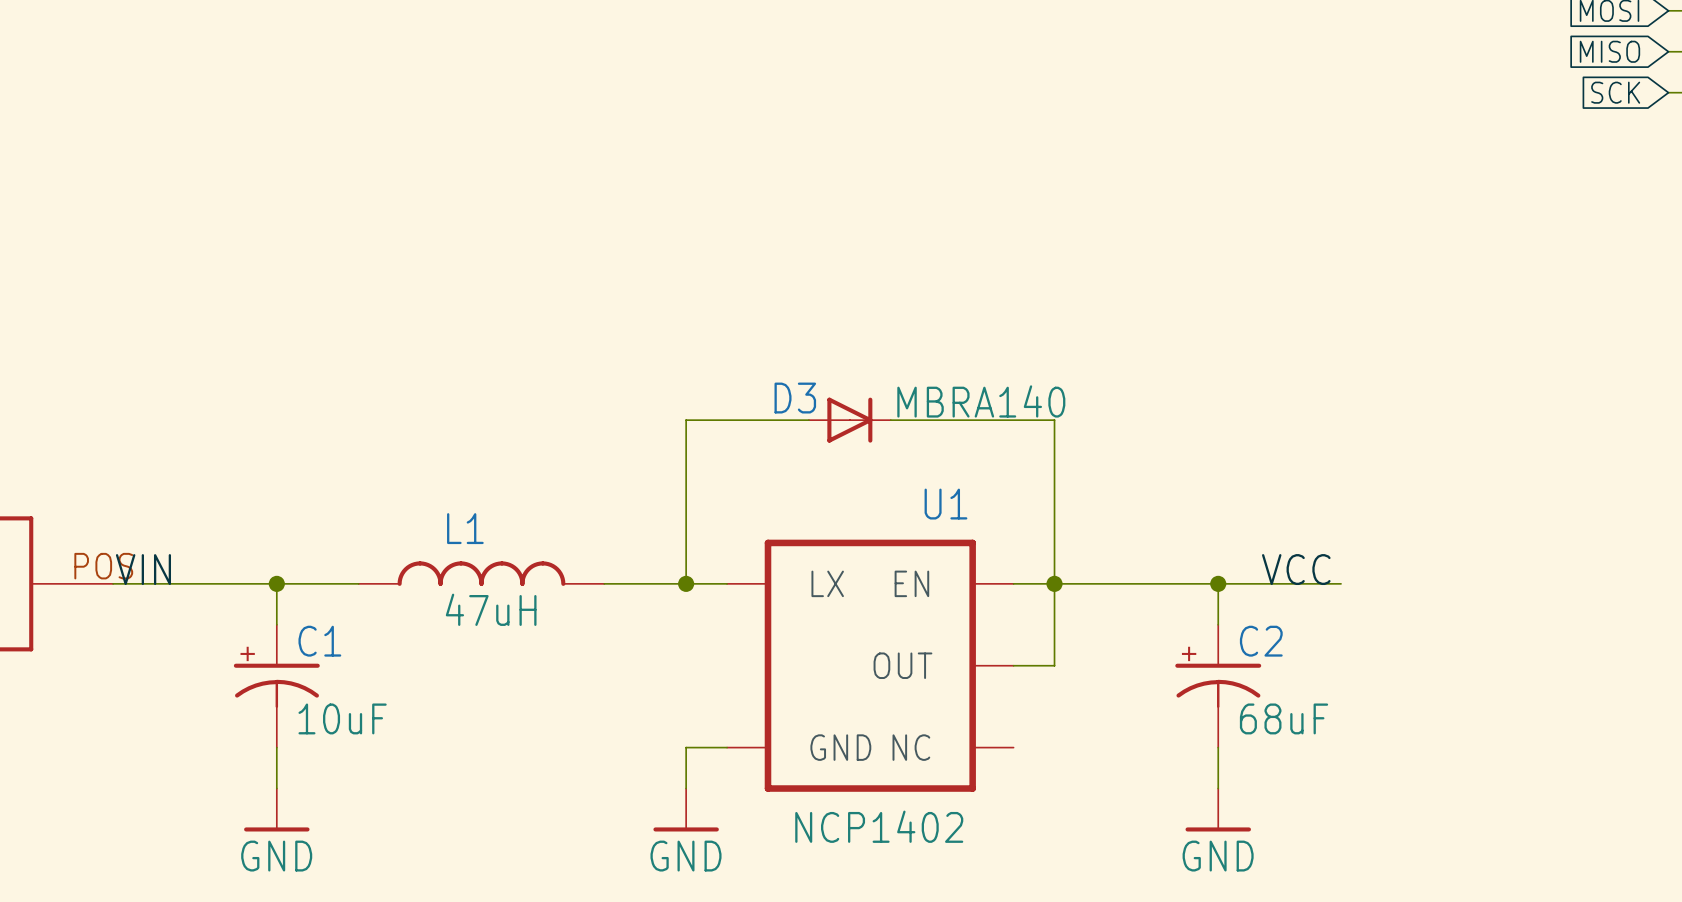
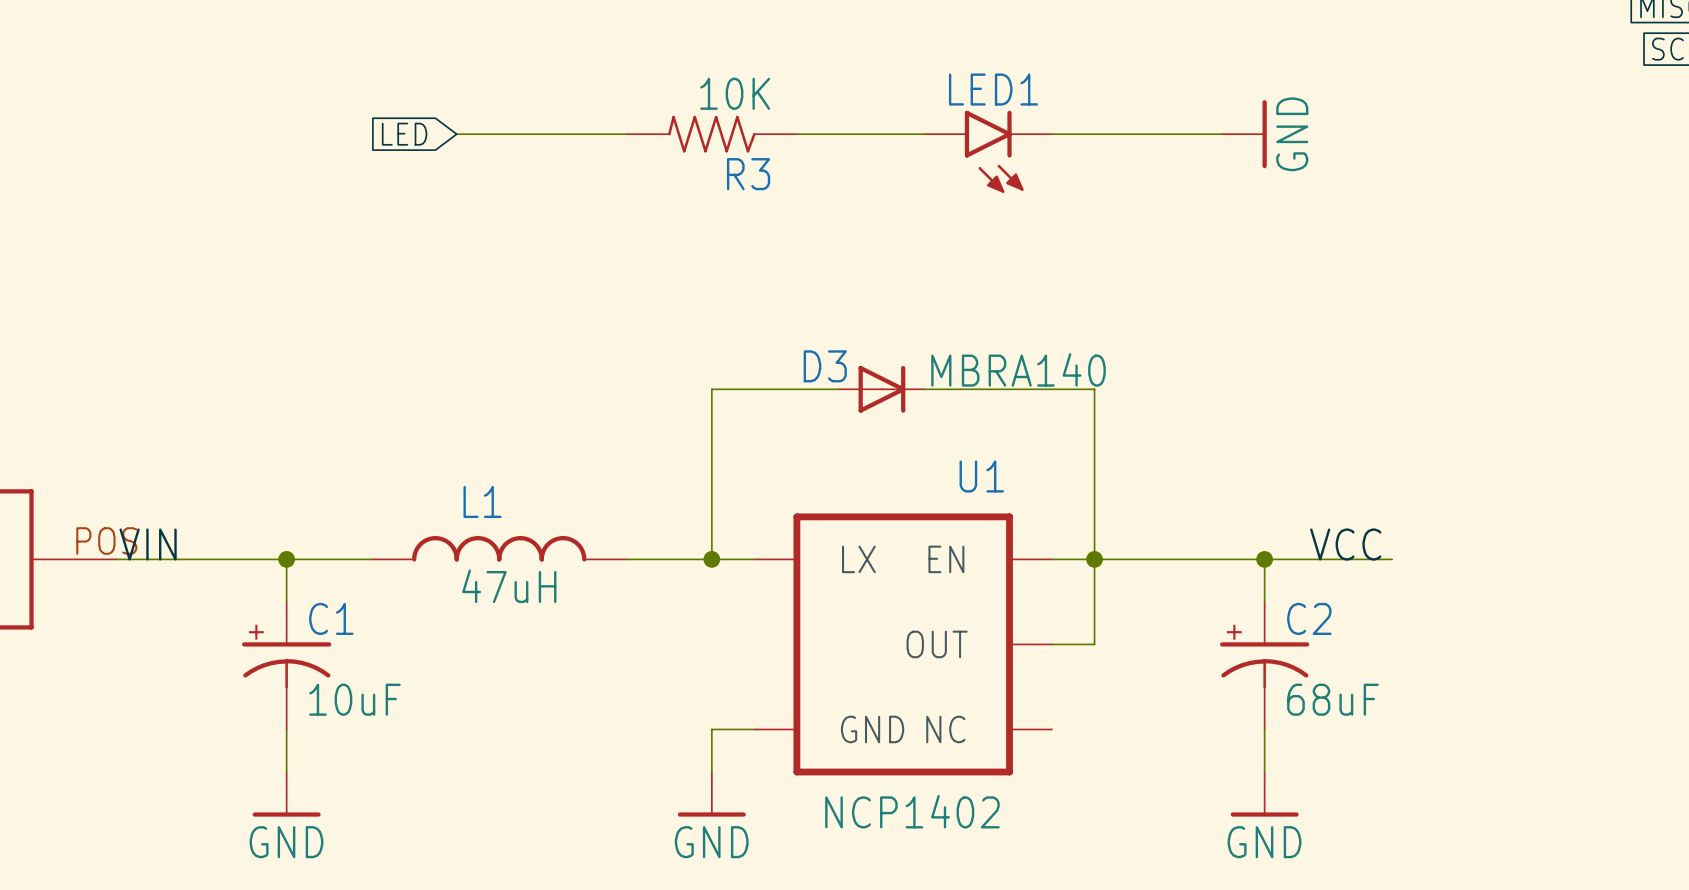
global label: none -> LED (404, 134)
wire: none -> (456, 134) (626, 134)
R3: none -> 10K (711, 134)
wire: none -> (796, 134) (924, 134)
wire: none -> (1052, 134) (1222, 134)
power symbol: none -> GND (1244, 134)
LED1: none -> (988, 151)

